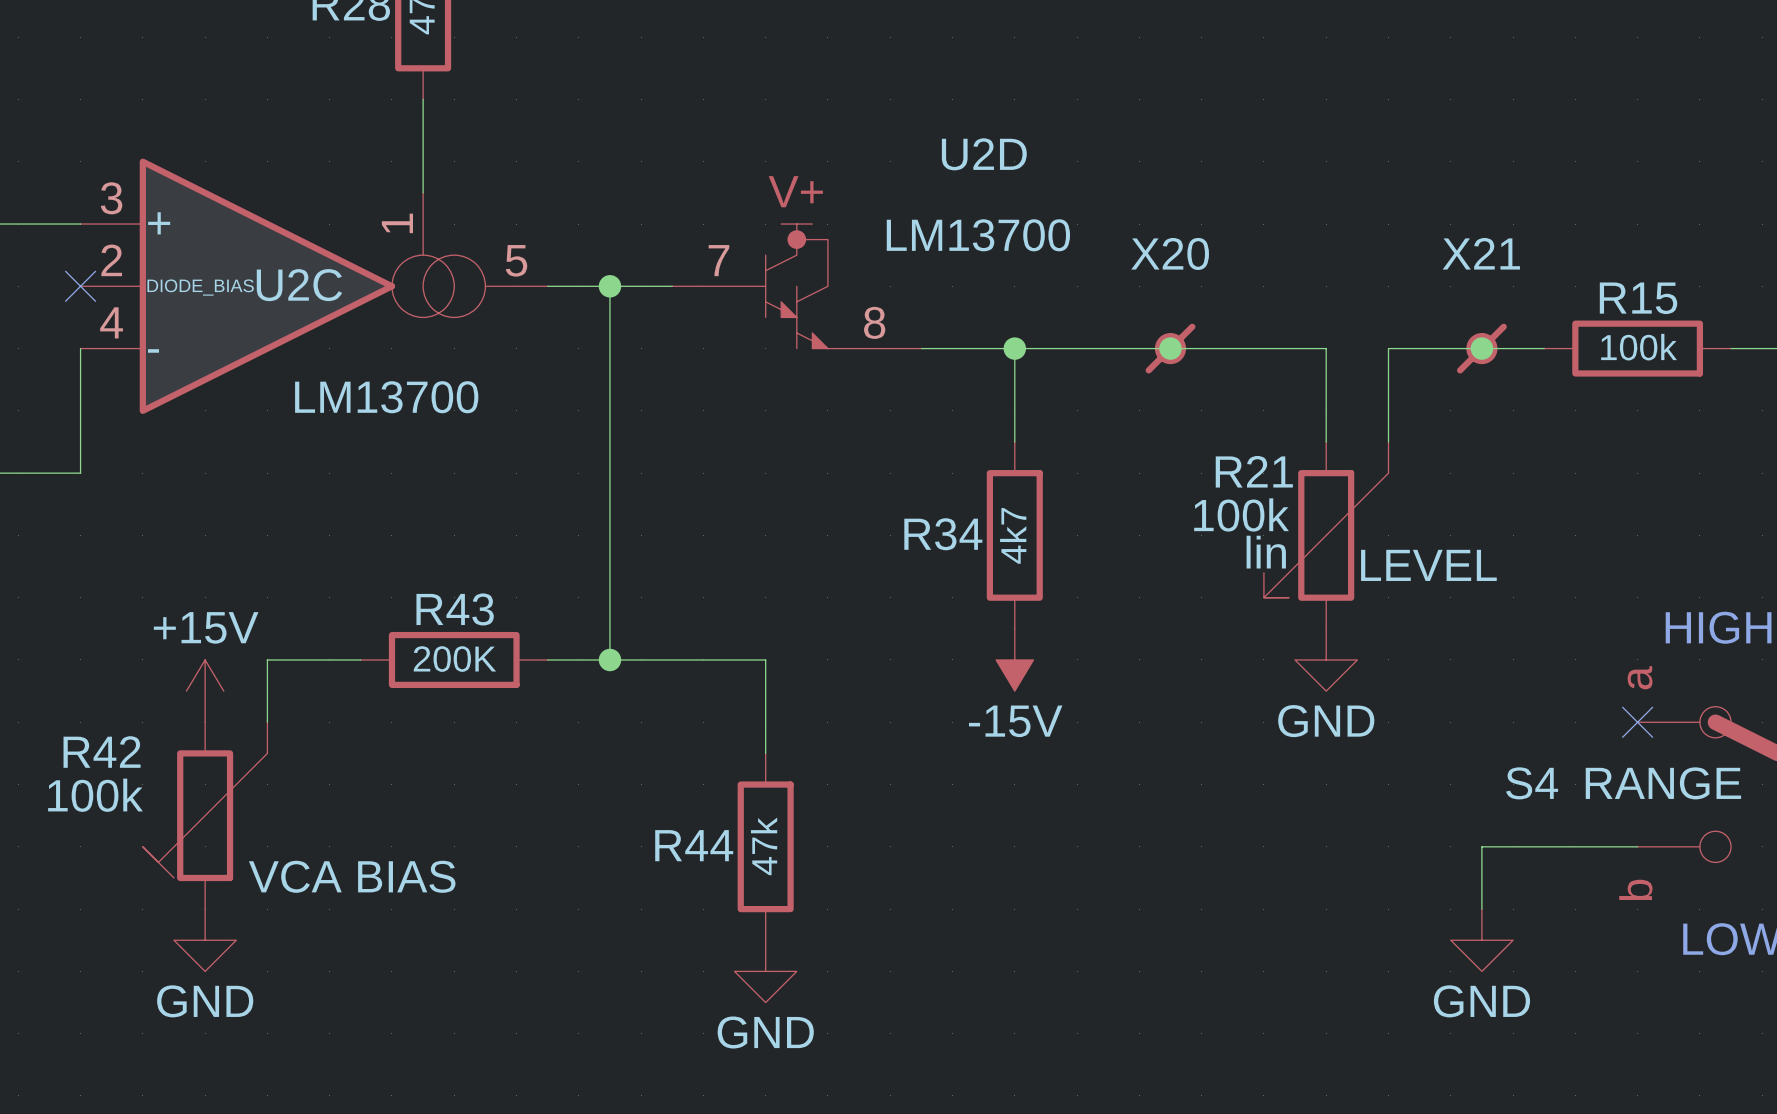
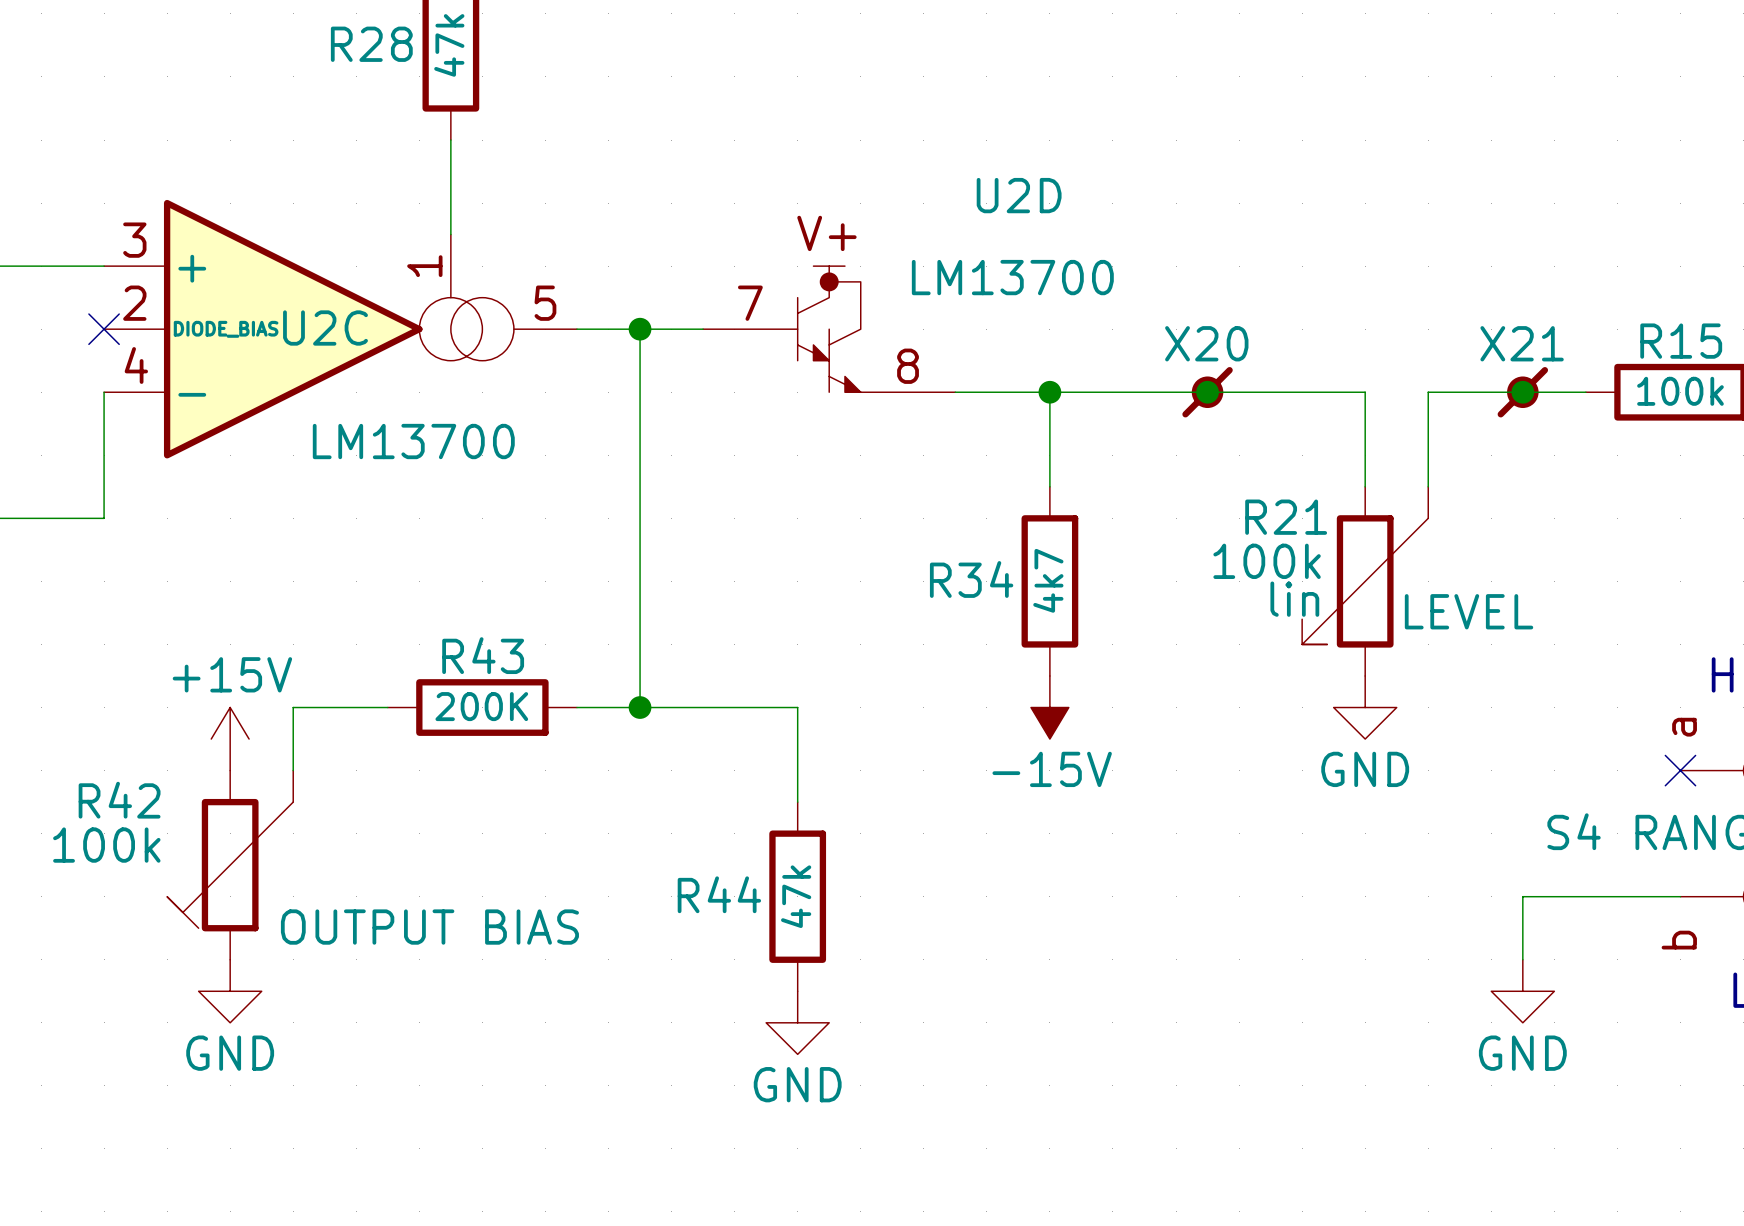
X20 name position: X20 (1170, 253) -> X20 (1206, 343)
X21 name position: X21 (1481, 253) -> X21 (1522, 343)
R42 text: VCA BIAS (352, 876) -> OUTPUT BIAS (429, 927)

